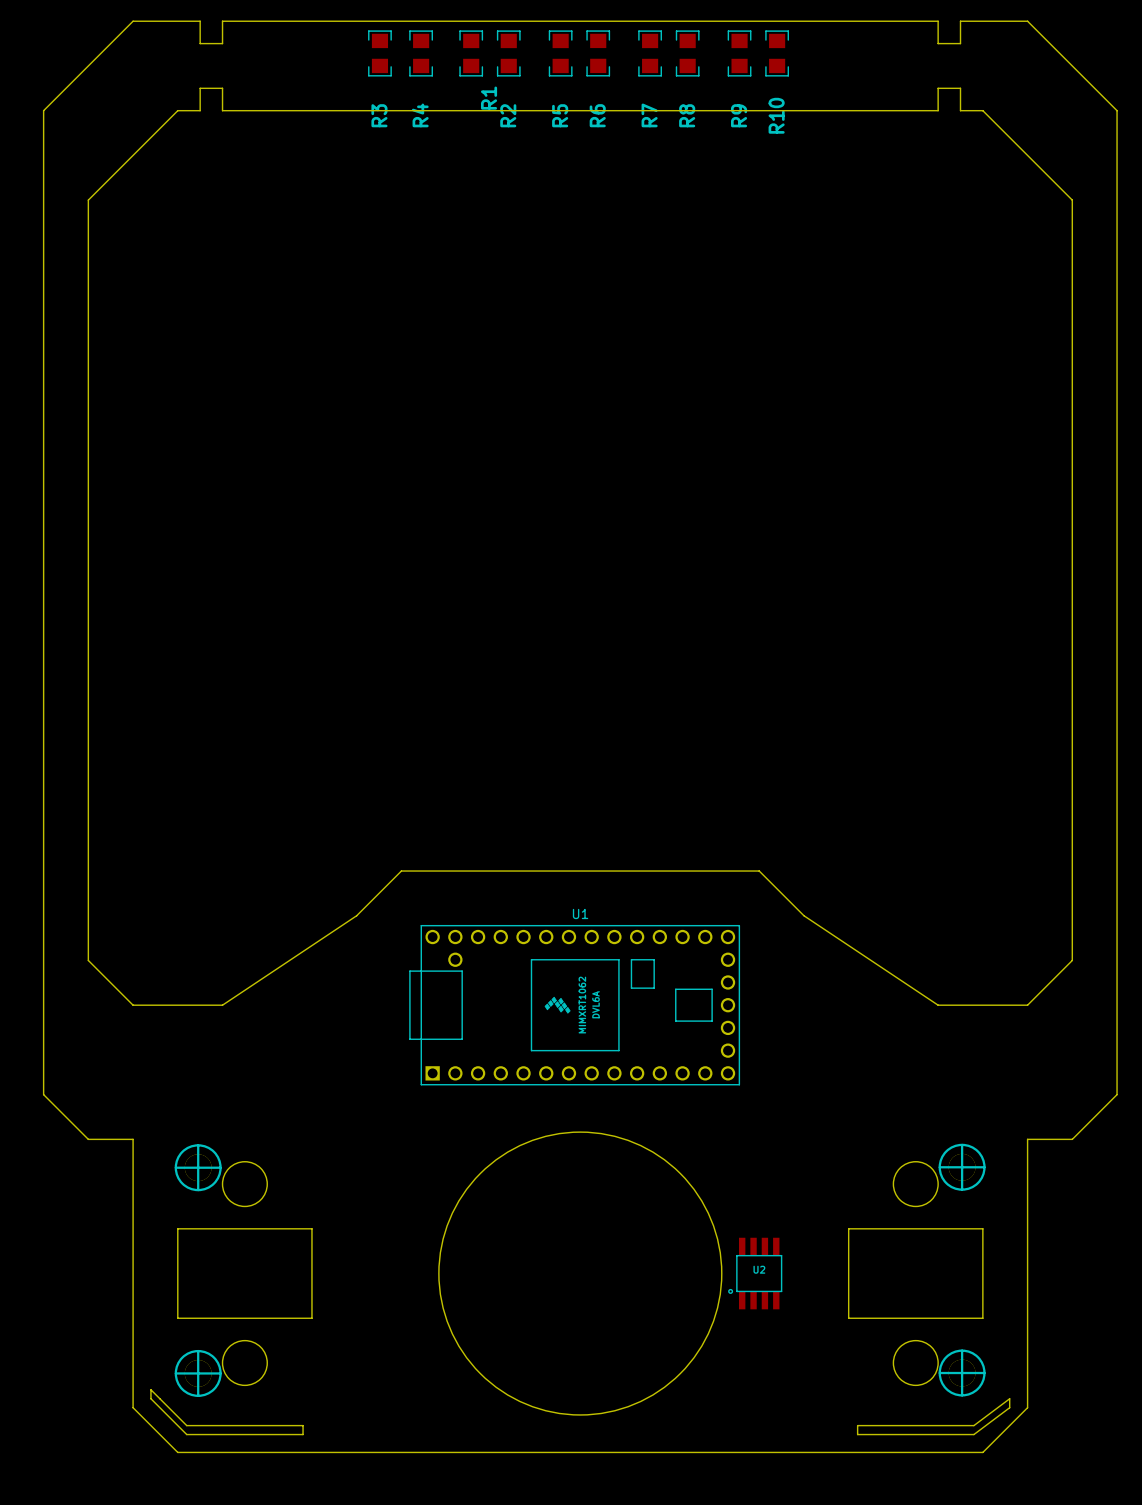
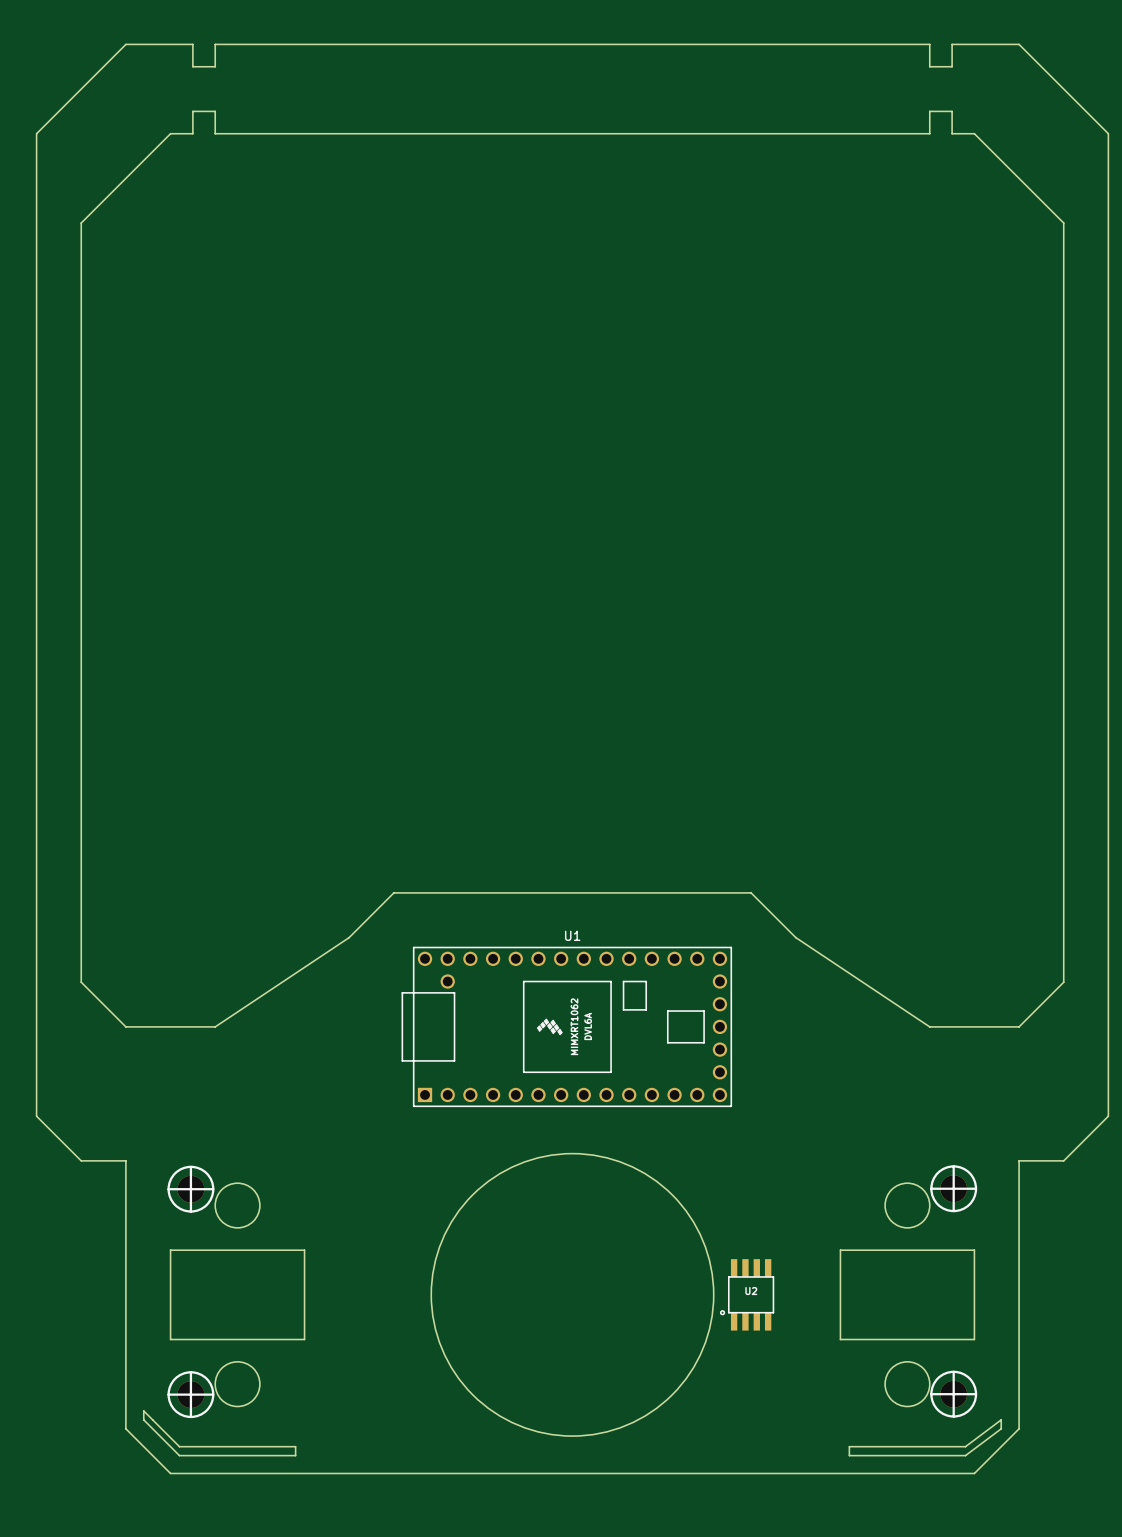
R3: (379, 53) -> none
R4: (421, 53) -> none
R1: (471, 53) -> none
R2: (508, 53) -> none
R5: (560, 53) -> none
R6: (598, 53) -> none
R7: (650, 53) -> none
R8: (687, 53) -> none
R9: (739, 53) -> none
R10: (777, 53) -> none

